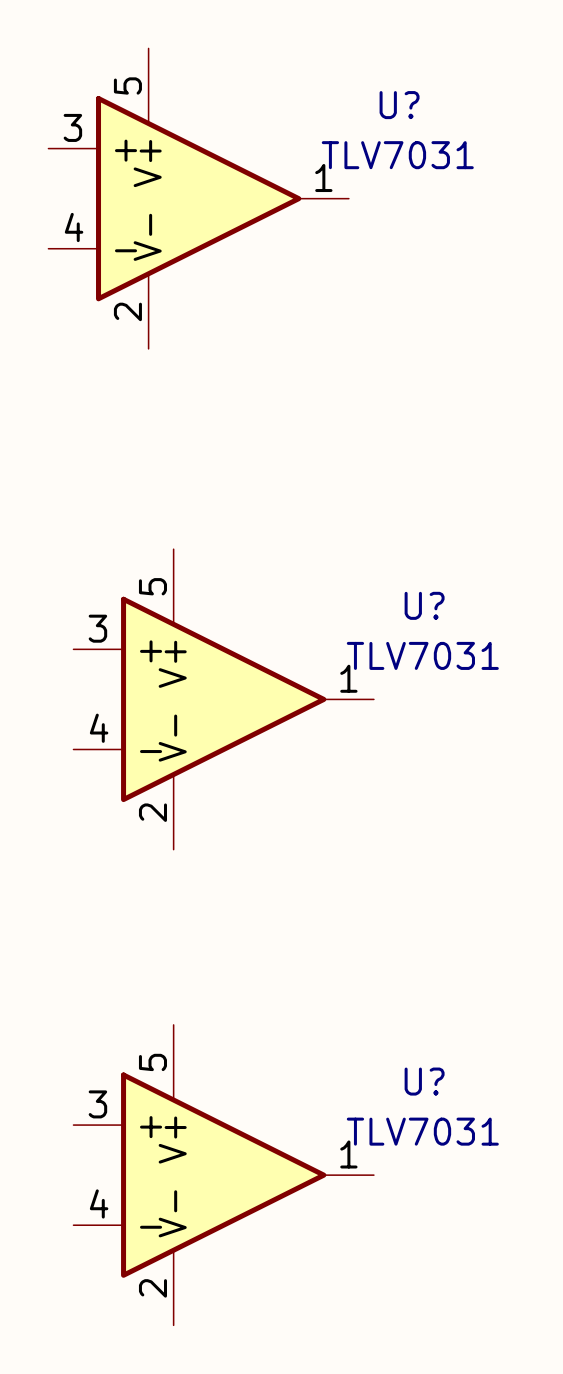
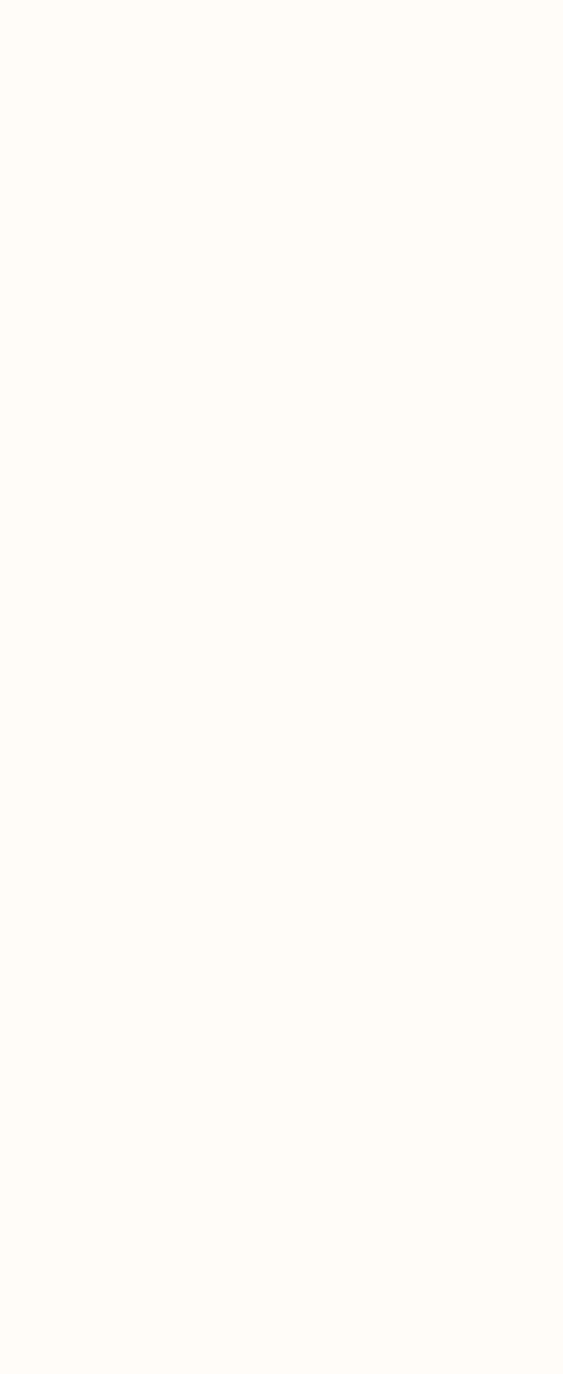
U?: TLV7031 (198, 198) -> none
U?: TLV7031 (223, 699) -> none
U?: TLV7031 (223, 1175) -> none

